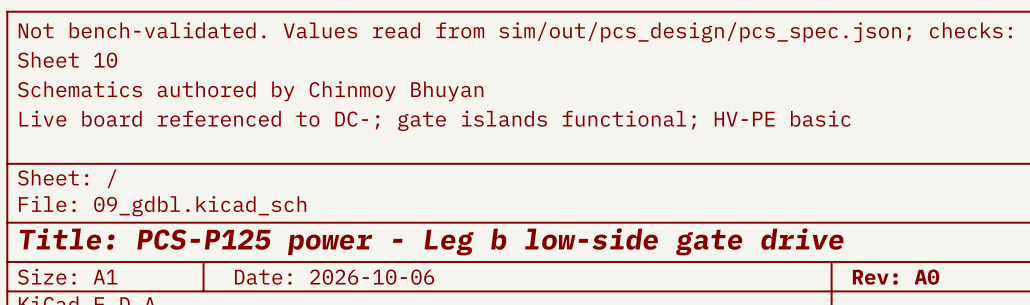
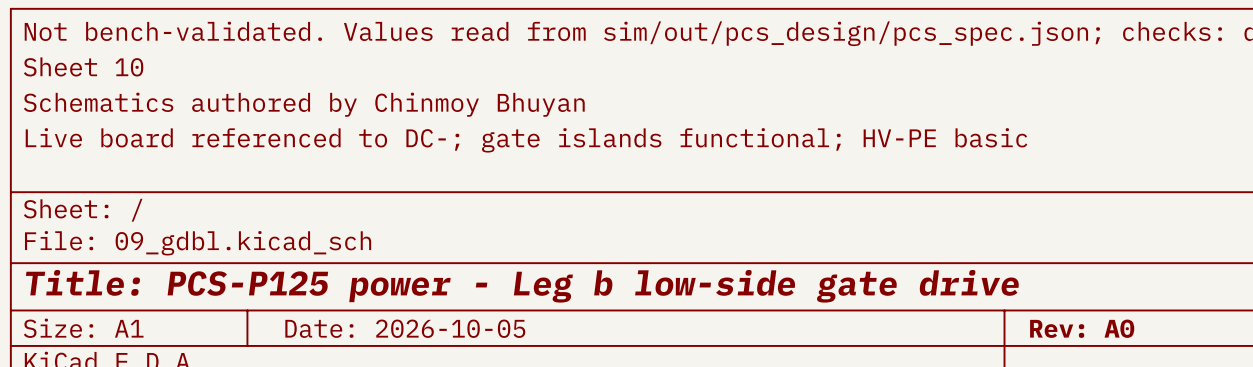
title block: Date: 2026-10-06 (334, 277) -> Date: 2026-10-05 (405, 328)

